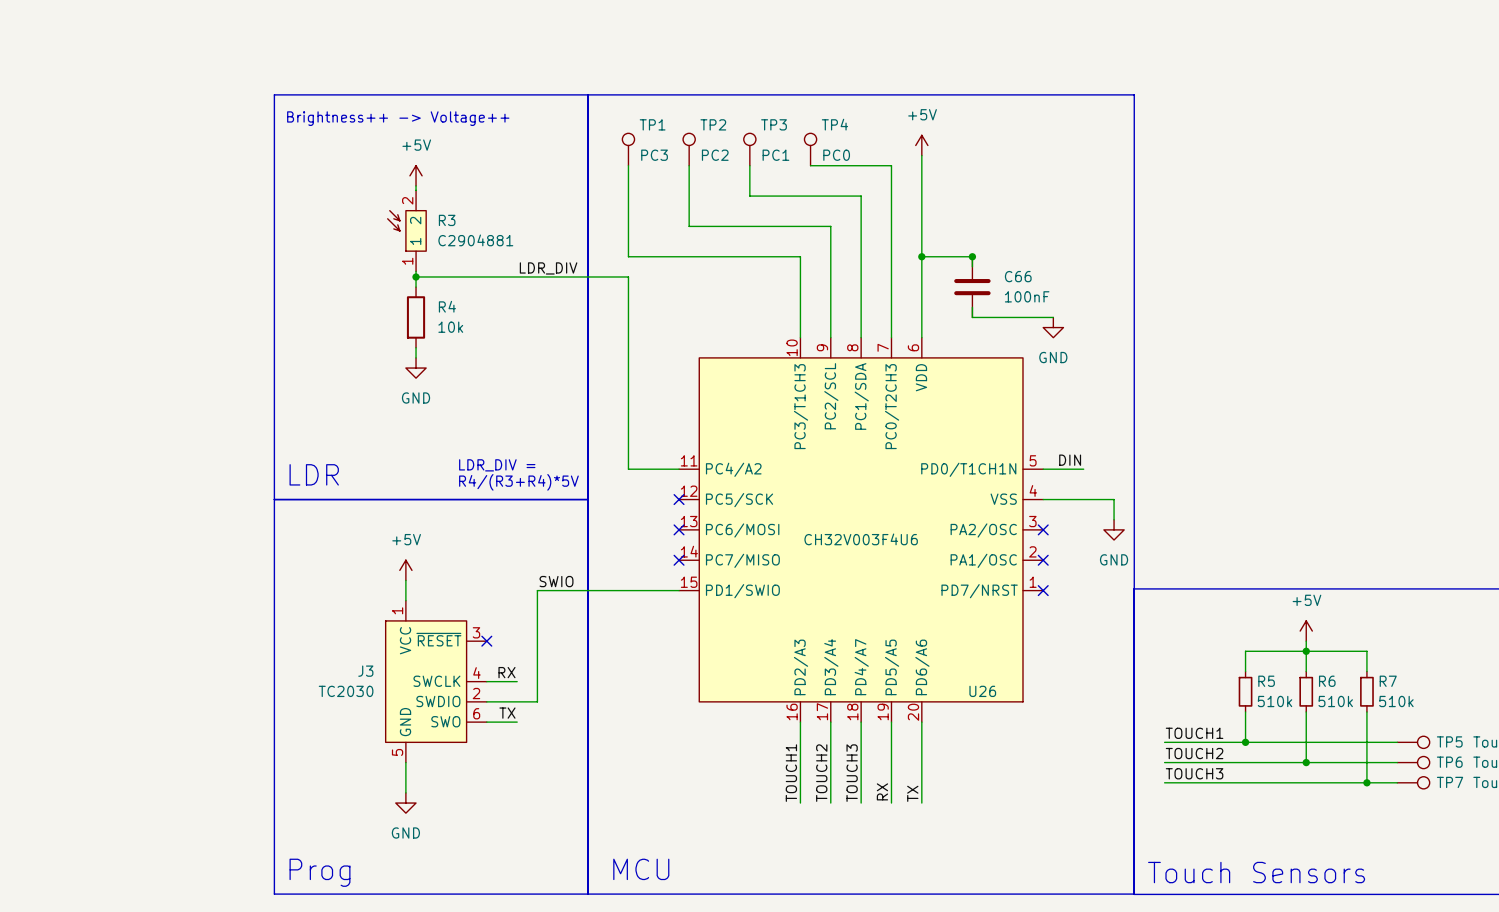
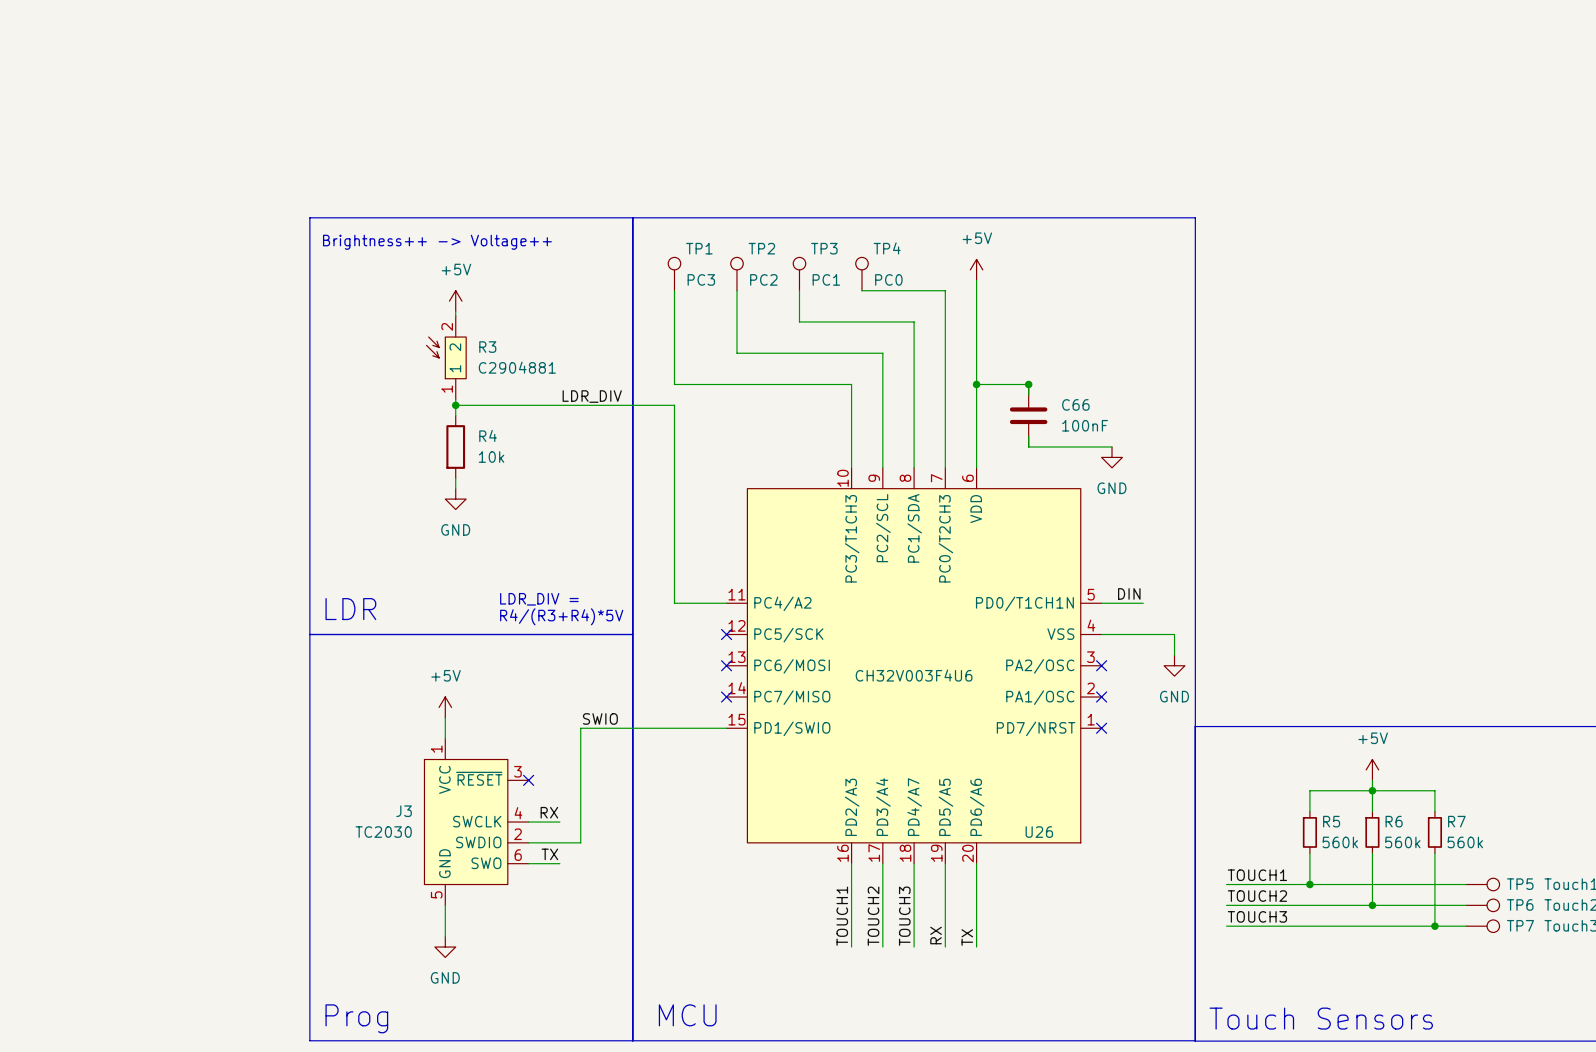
R5 value: 510k (1275, 701) -> 560k (1340, 842)
R6 value: 510k (1335, 701) -> 560k (1402, 842)
R7 value: 510k (1396, 701) -> 560k (1465, 842)

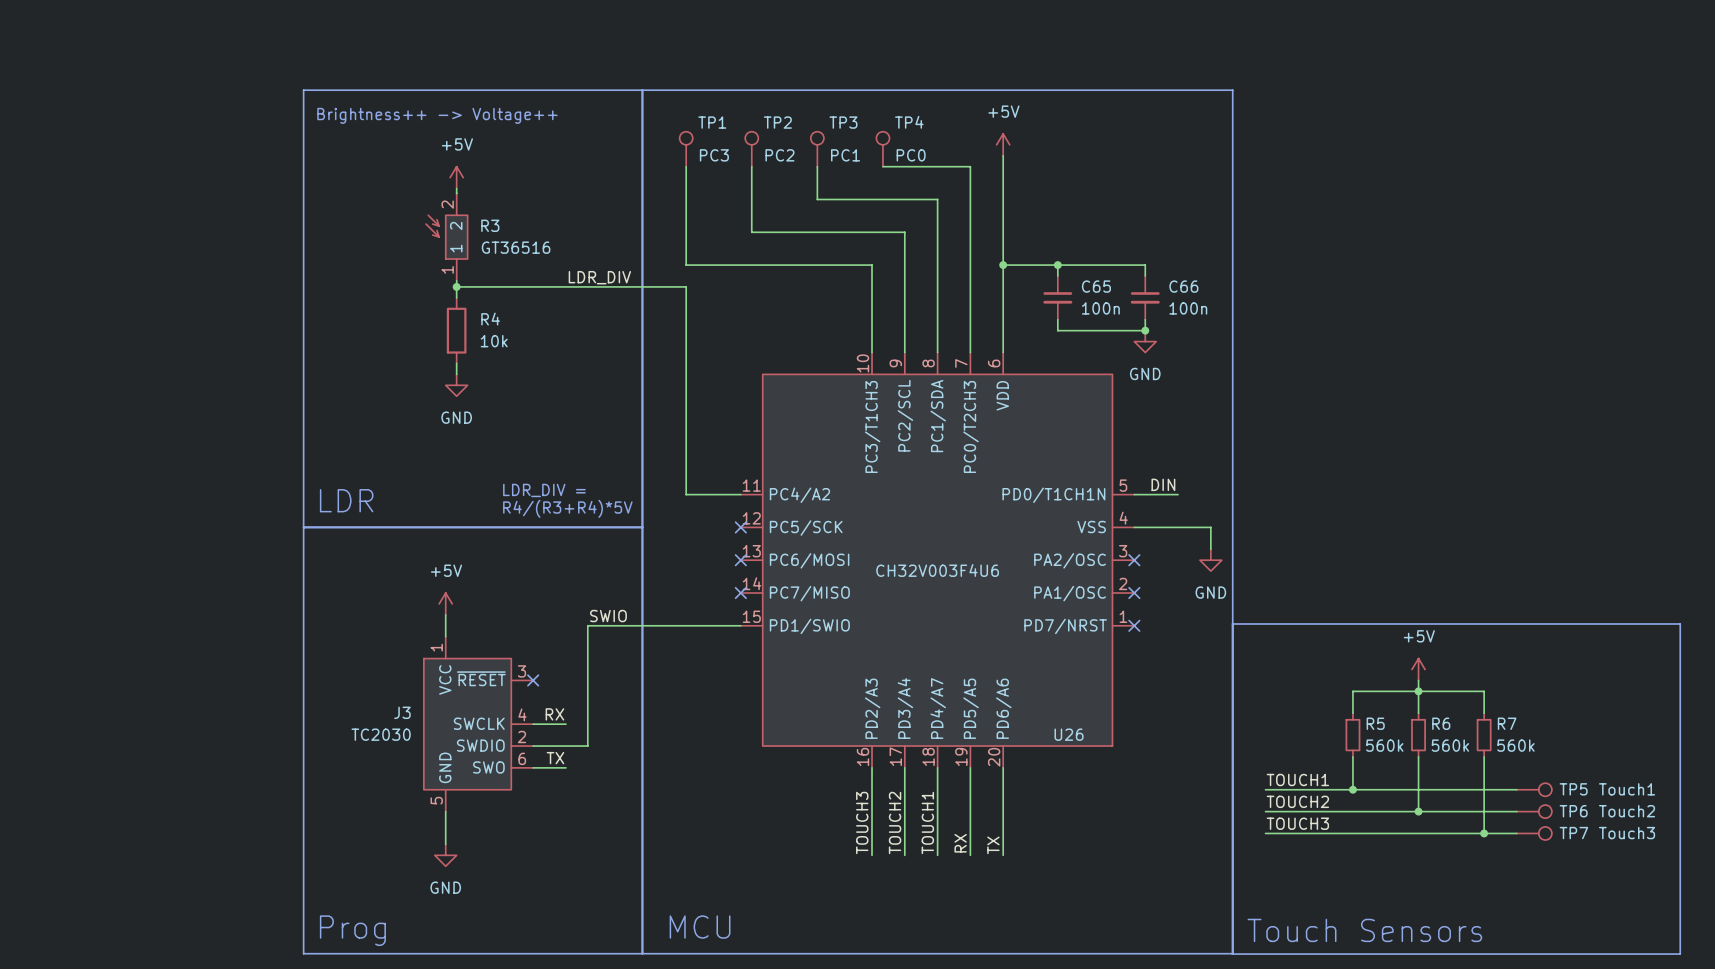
R3 value: C2904881 (517, 367) -> GT36516 (516, 247)
C66 symbol: [1009, 384, 1048, 447] -> [1130, 276, 1160, 320]
wire: none -> (1057, 265) (1145, 265) (1145, 276)
C65: none -> 100n (1057, 297)
C66 value: 100nF (1085, 425) -> 100n (1188, 308)
wire: none -> (1145, 319) (1145, 330)
junction: none -> (1145, 330)
label: TOUCH1 (842, 916) -> TOUCH3 (862, 822)
label: TOUCH3 (904, 916) -> TOUCH1 (927, 822)

